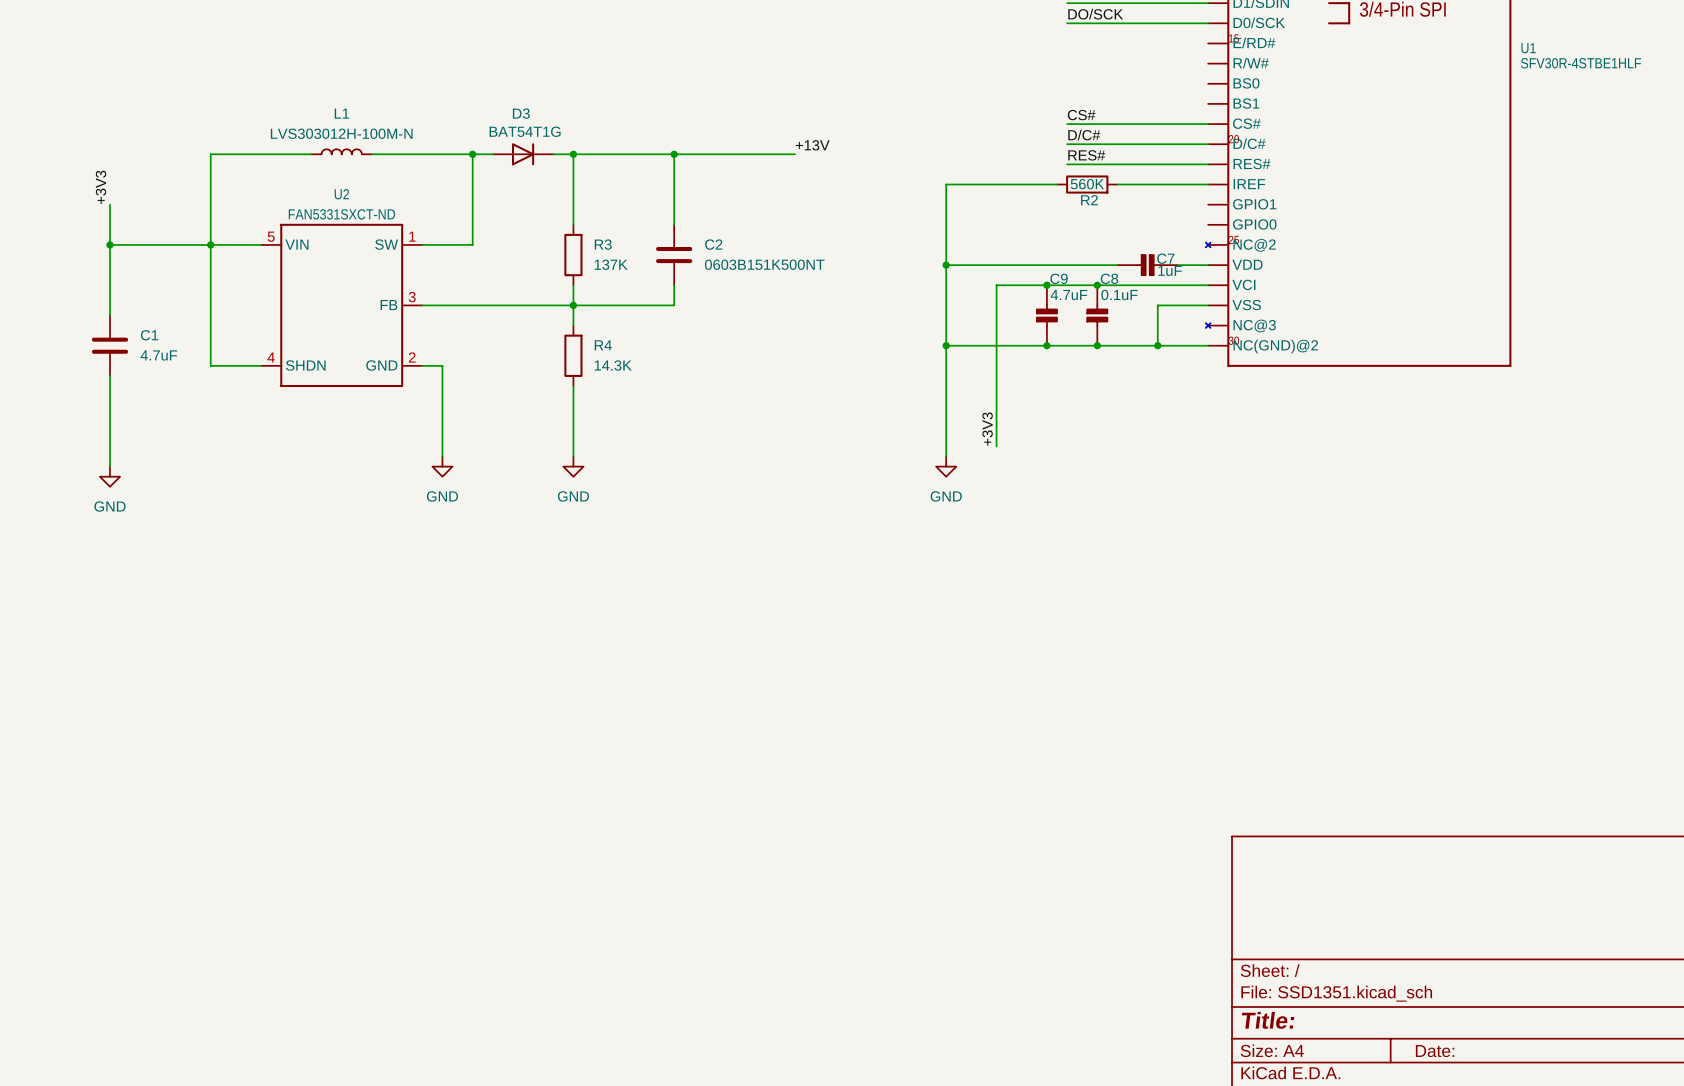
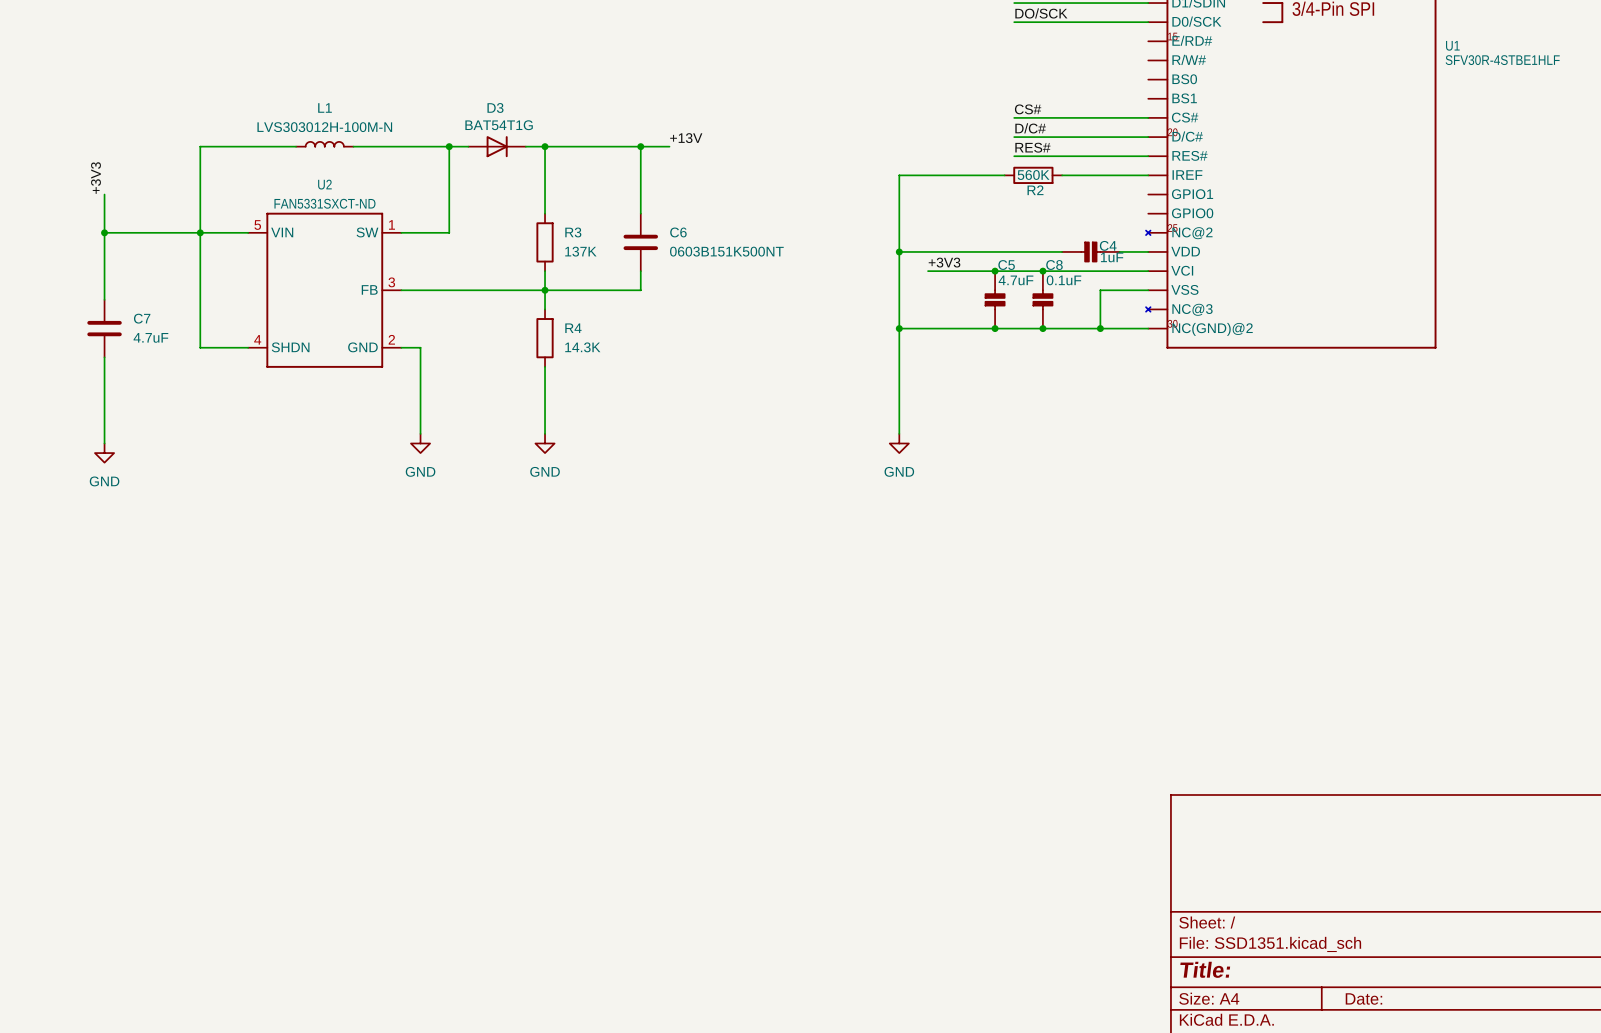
label position: +13V (812, 145) -> +13V (686, 138)
wire: (704, 154) (795, 154) -> none
C2 name: C2 (713, 244) -> C6 (678, 232)
C7 name: C7 (1165, 258) -> C4 (1108, 245)
C9 name: C9 (1059, 278) -> C5 (1006, 265)
wire: (996, 285) (996, 446) -> (947, 271) (928, 271)
C1 name: C1 (149, 335) -> C7 (142, 318)
label rotation: 0° (987, 429) -> 90° clockwise (944, 262)
label position: +3V3 (987, 429) -> +3V3 (944, 262)

